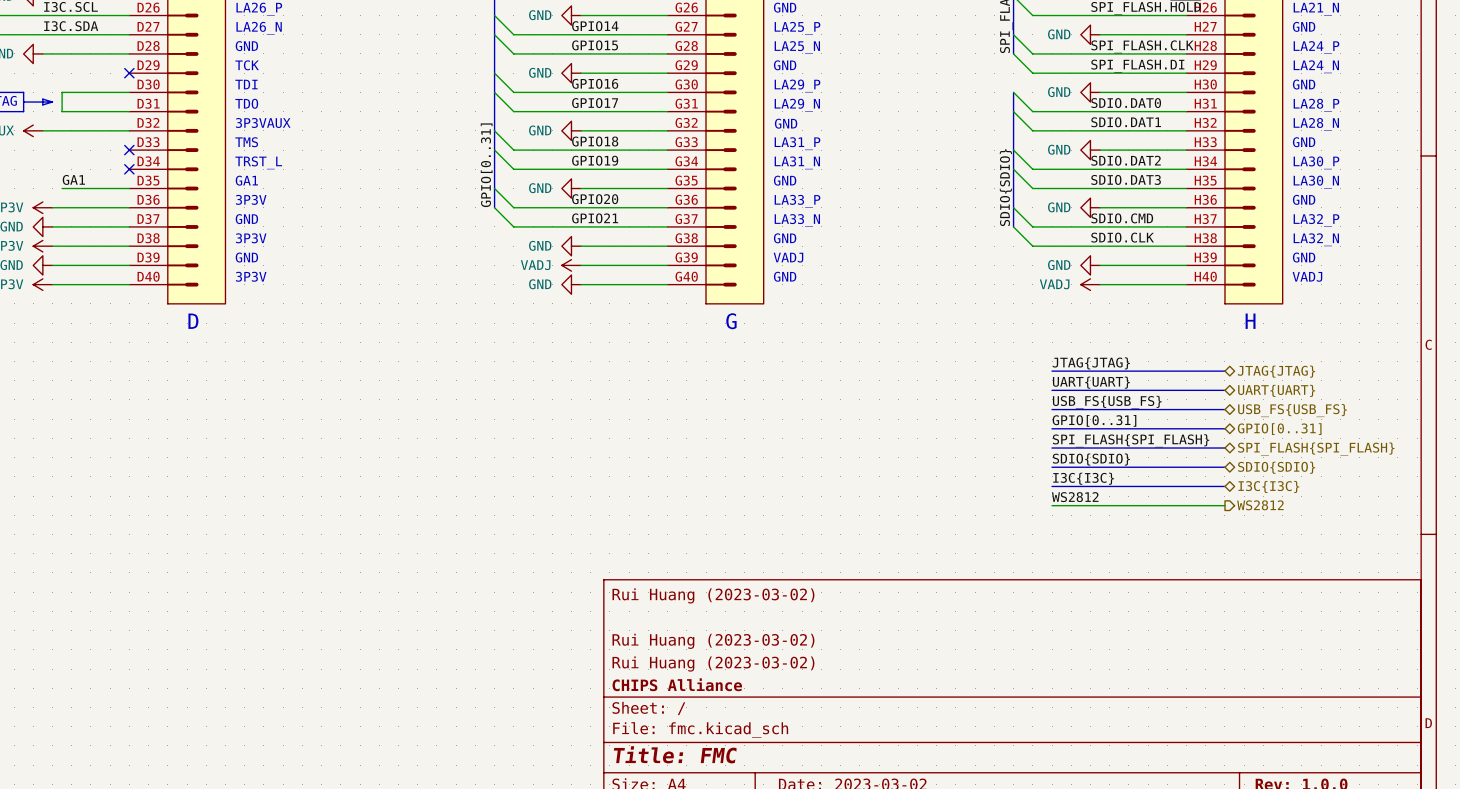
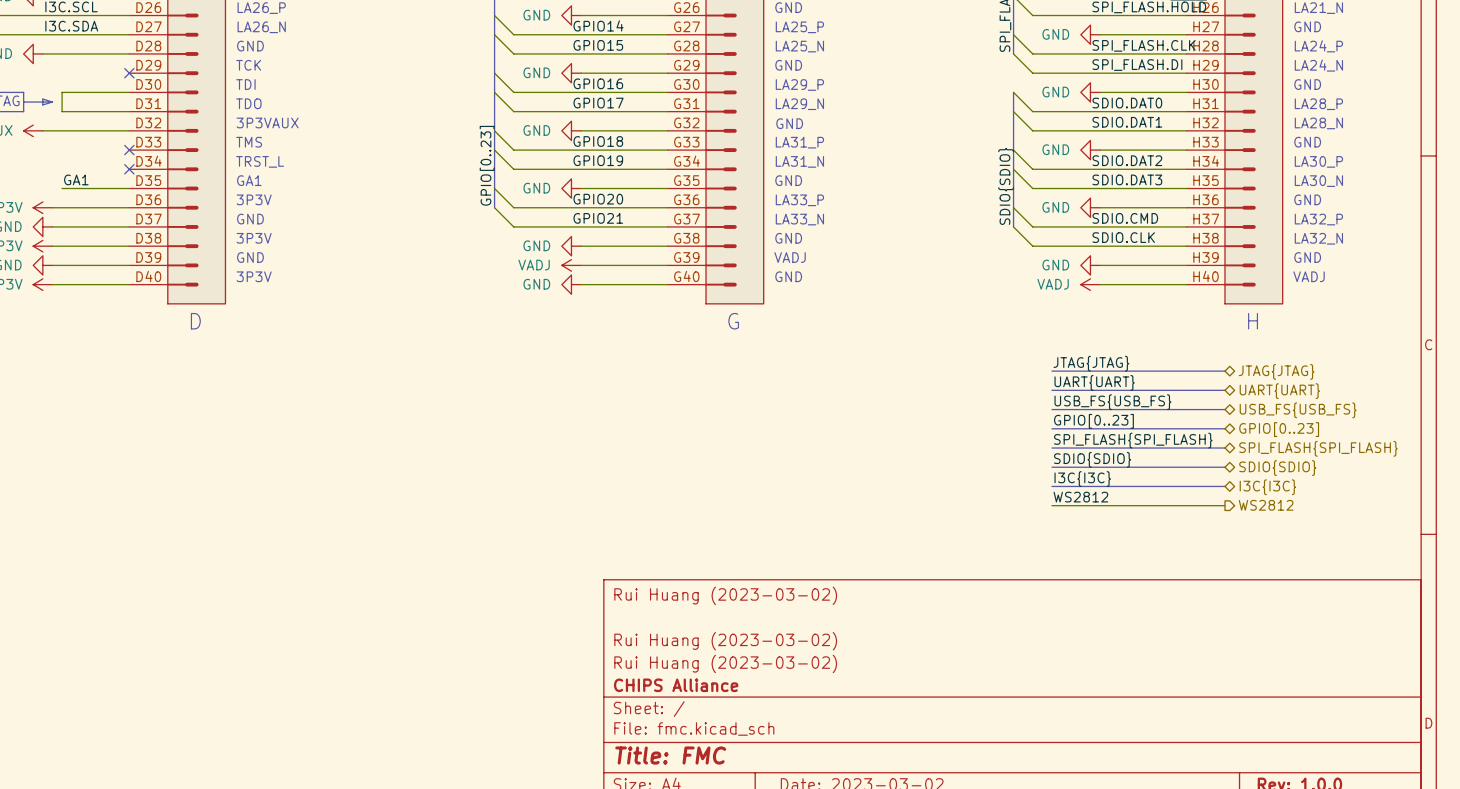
label: GPIO[0..31] (486, 165) -> GPIO[0..23] (487, 165)
label: GPIO[0..31] (1094, 420) -> GPIO[0..23] (1093, 421)
hierarchical label: GPIO[0..31] (1279, 429) -> GPIO[0..23] (1279, 429)

